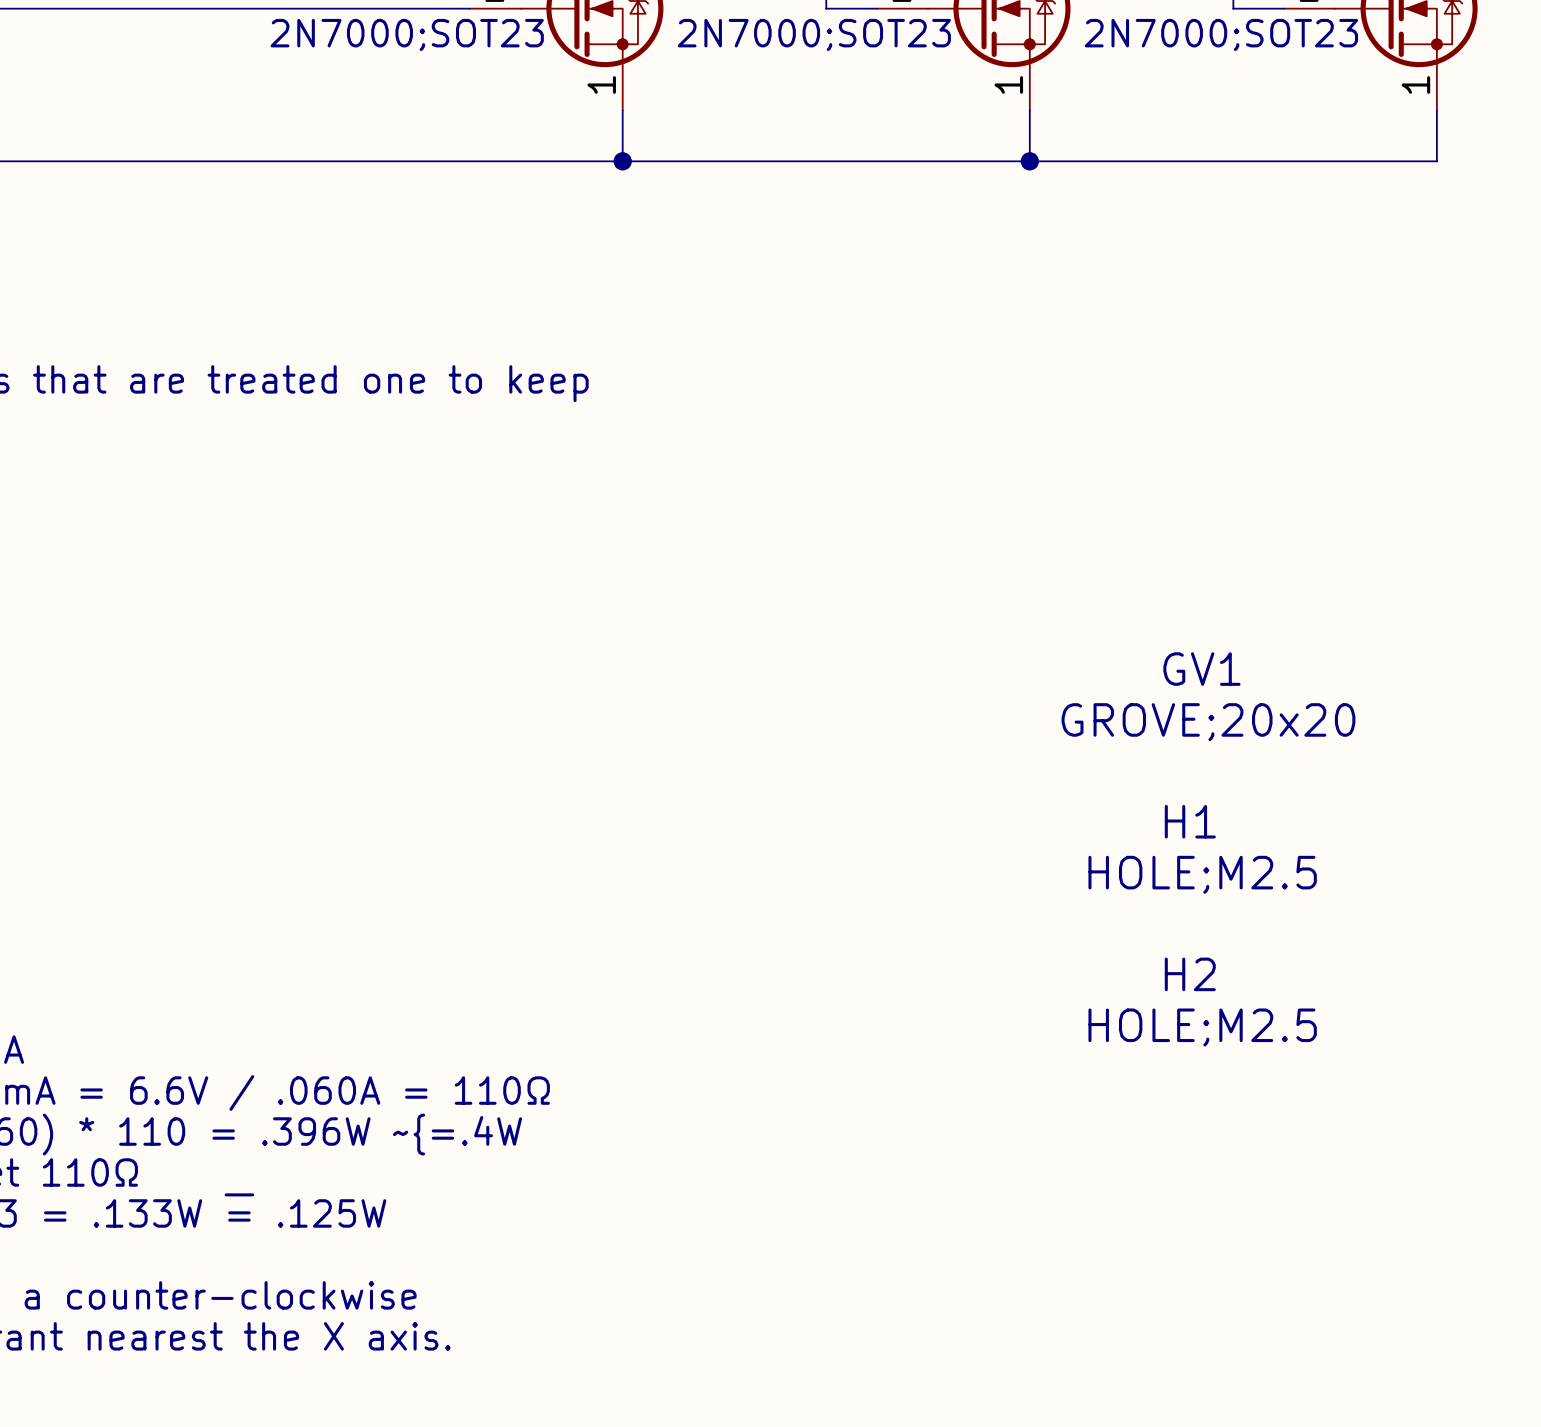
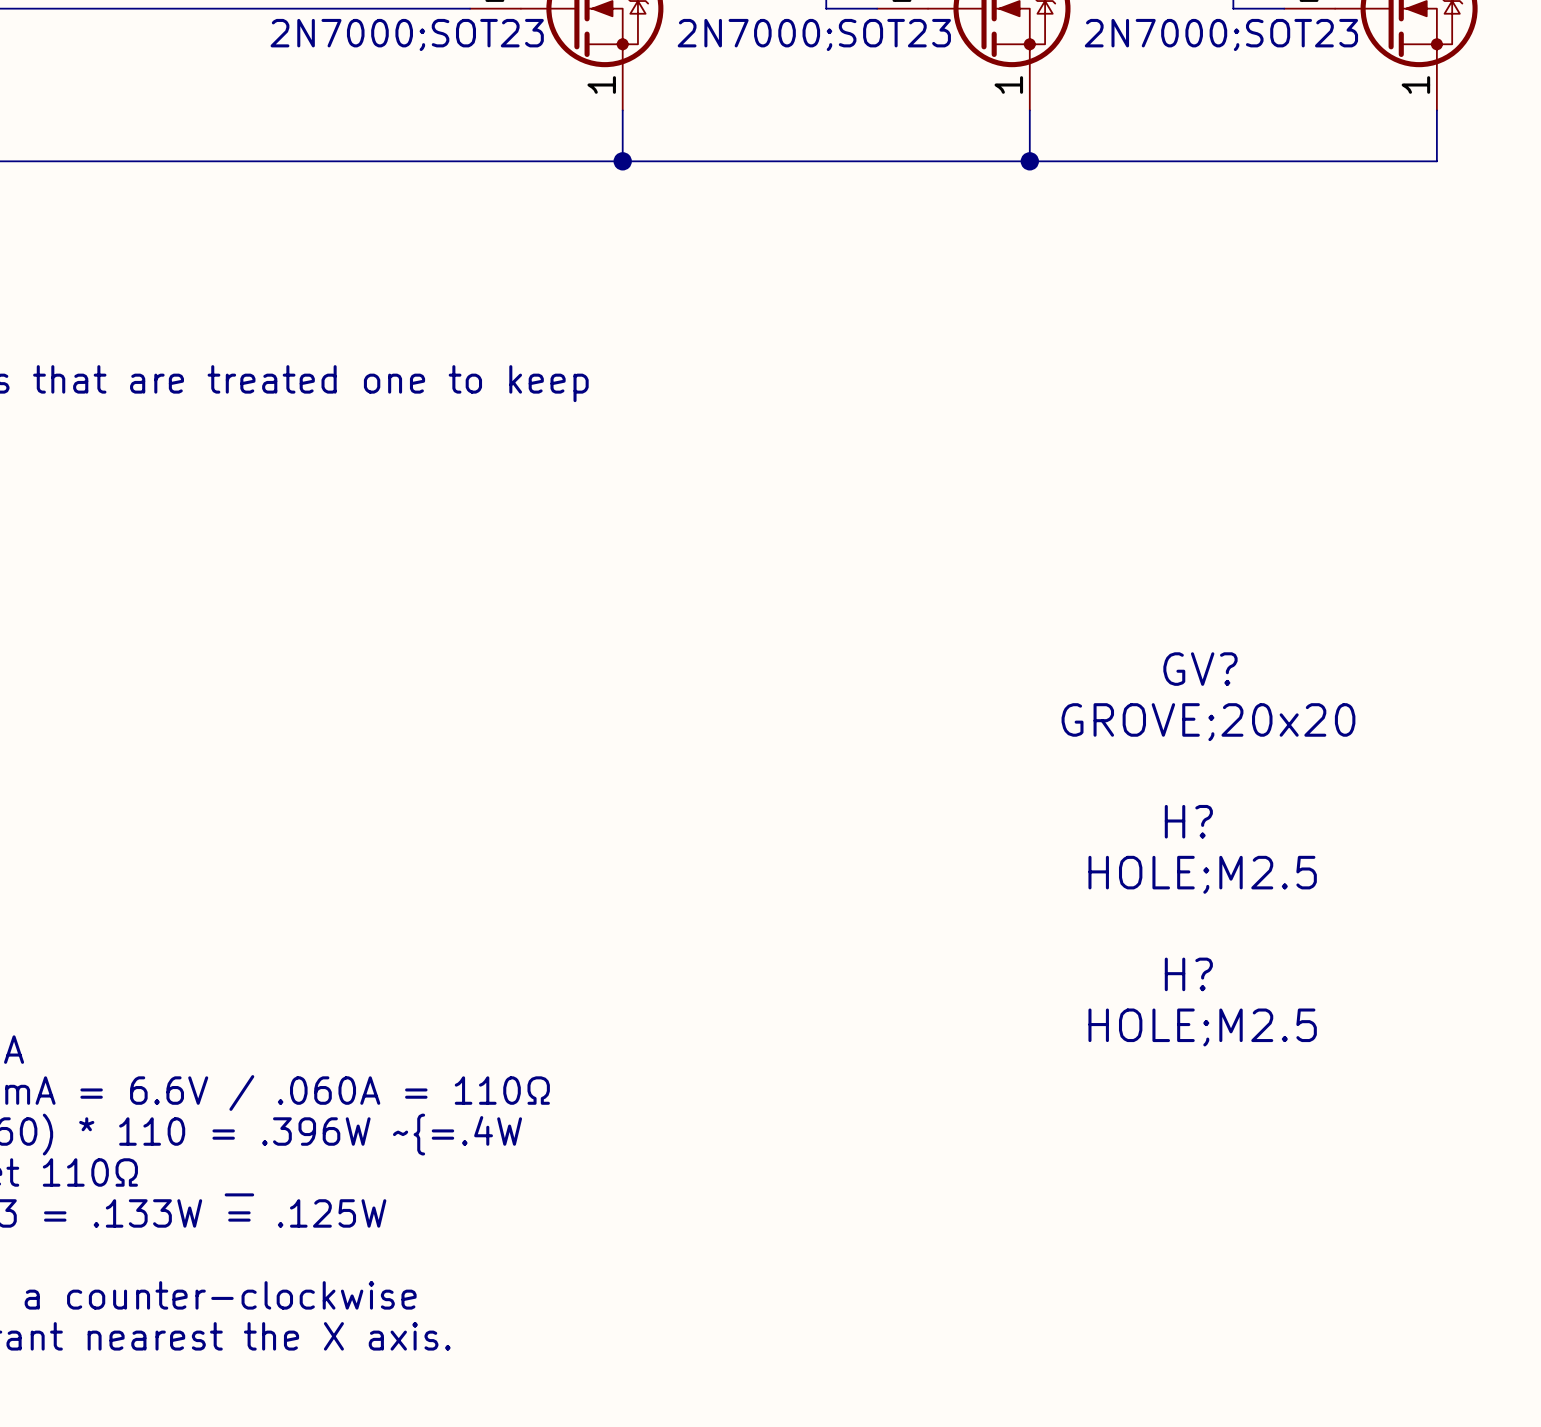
GV1 name: GV1 (1201, 669) -> GV? (1200, 669)
H1 name: H1 (1190, 821) -> H? (1188, 821)
H2 name: H2 (1190, 974) -> H? (1188, 974)

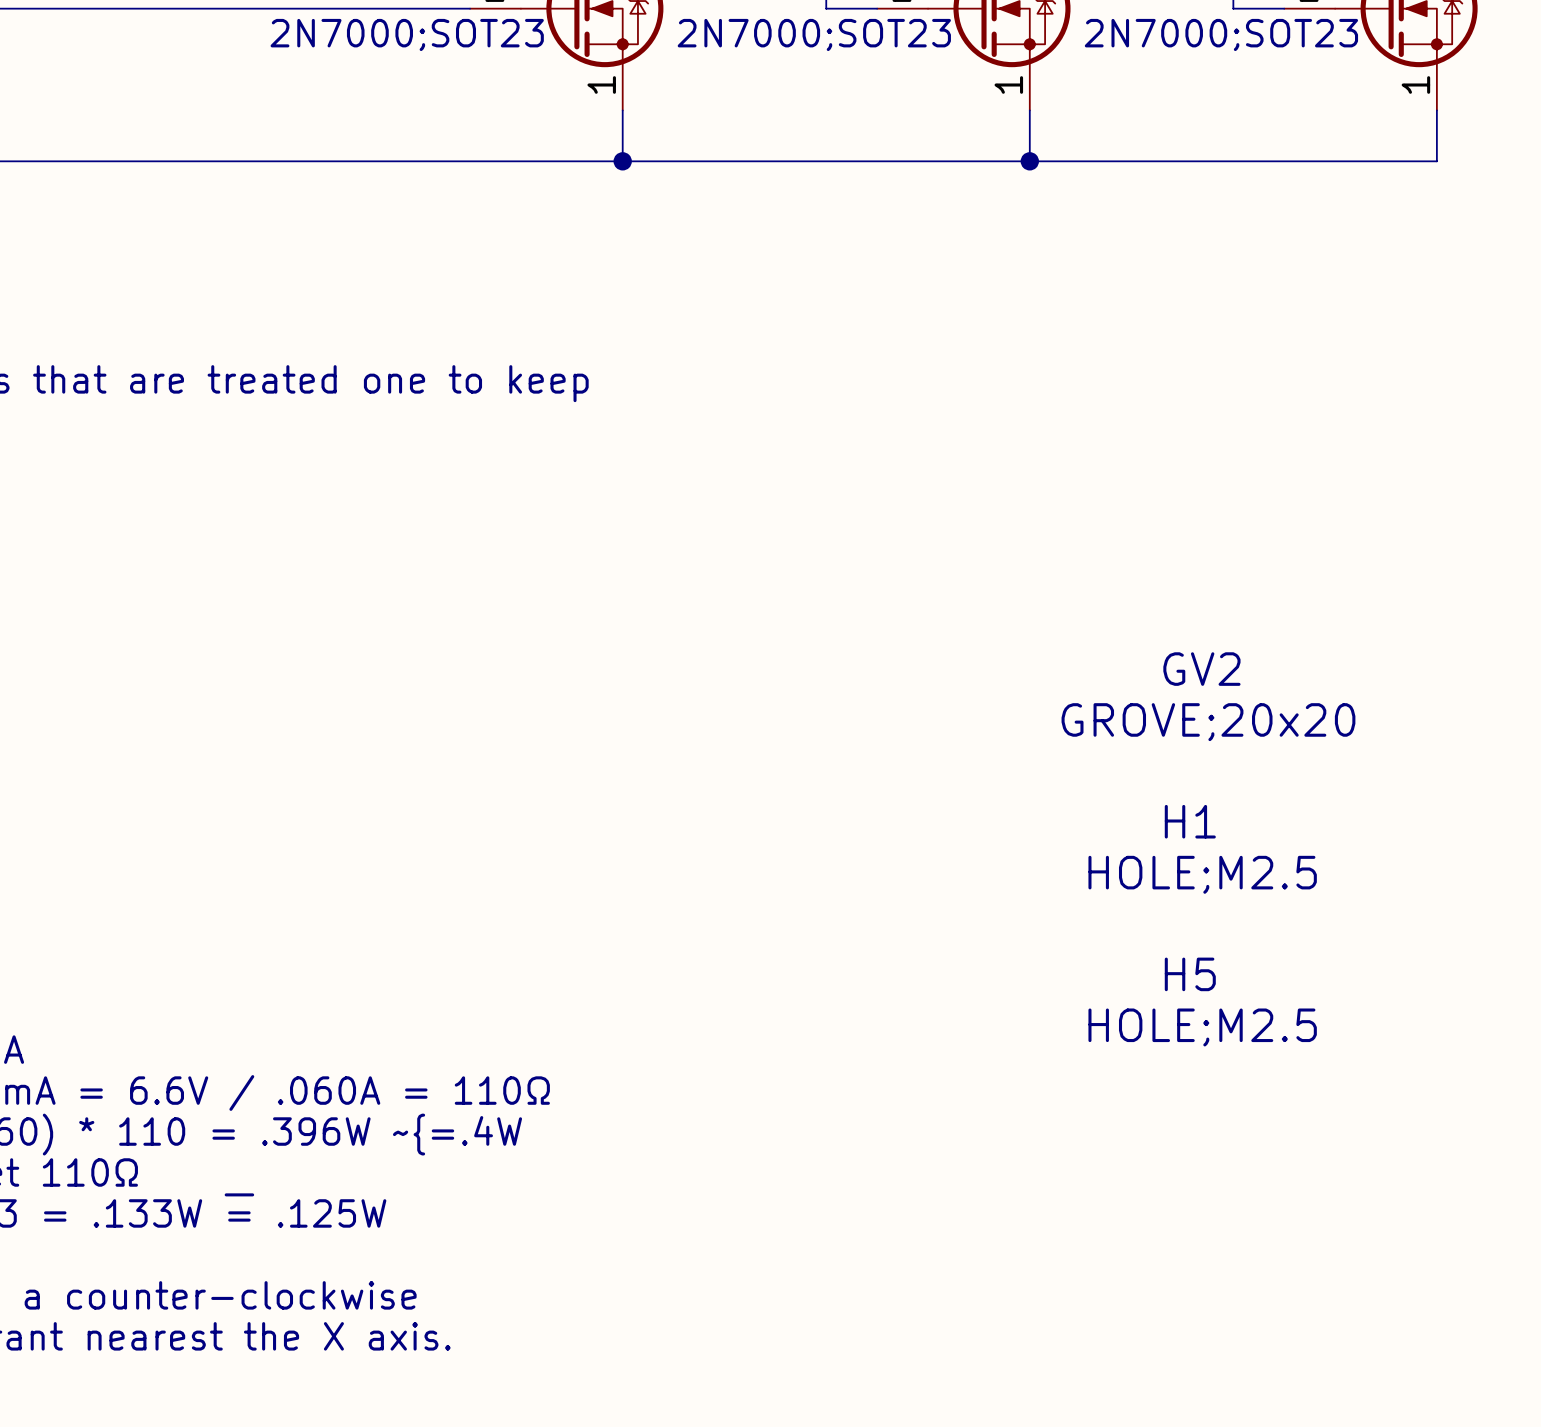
GV? name: GV? (1200, 669) -> GV2 (1201, 669)
H? name: H? (1188, 821) -> H1 (1190, 821)
H? name: H? (1188, 974) -> H5 (1190, 974)

